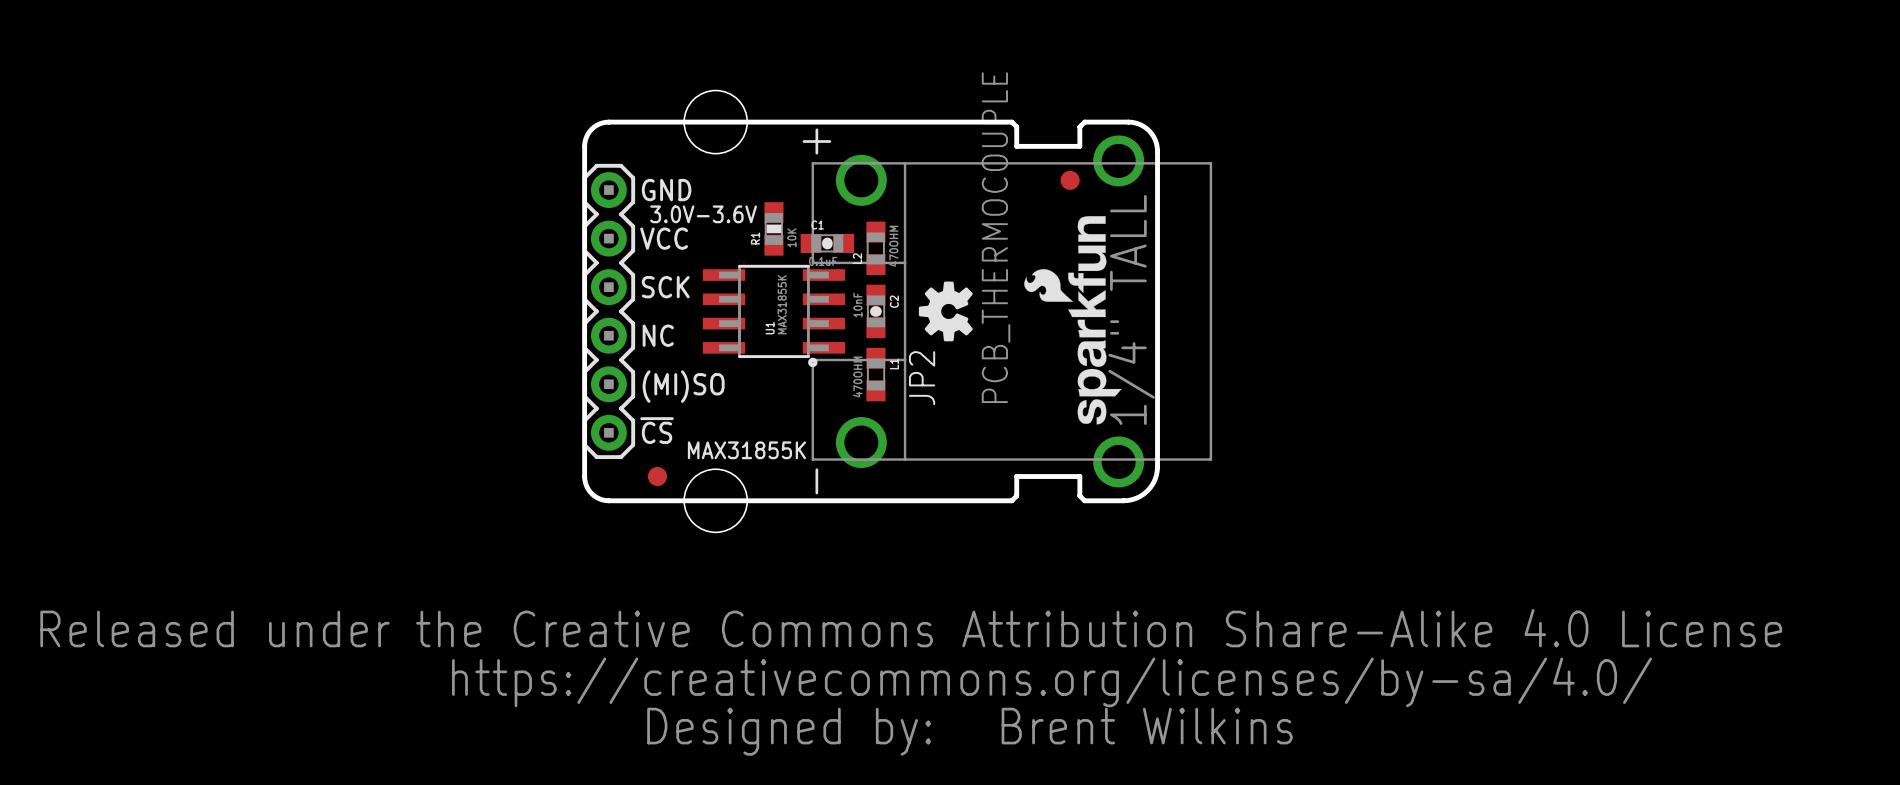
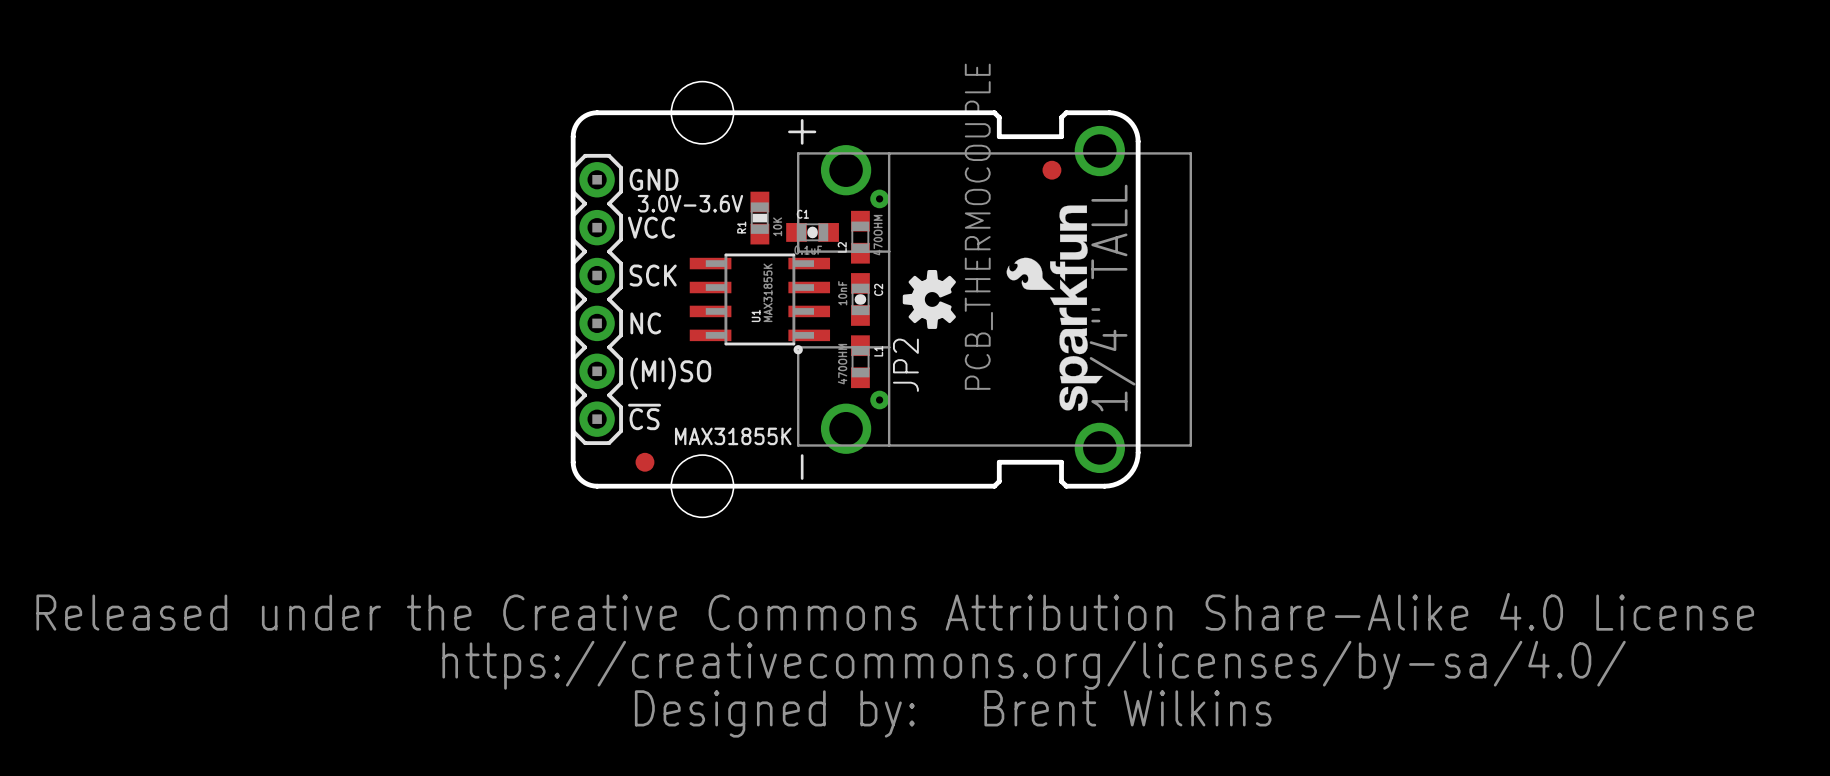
part: none -> (879, 198)
part: none -> (879, 400)

